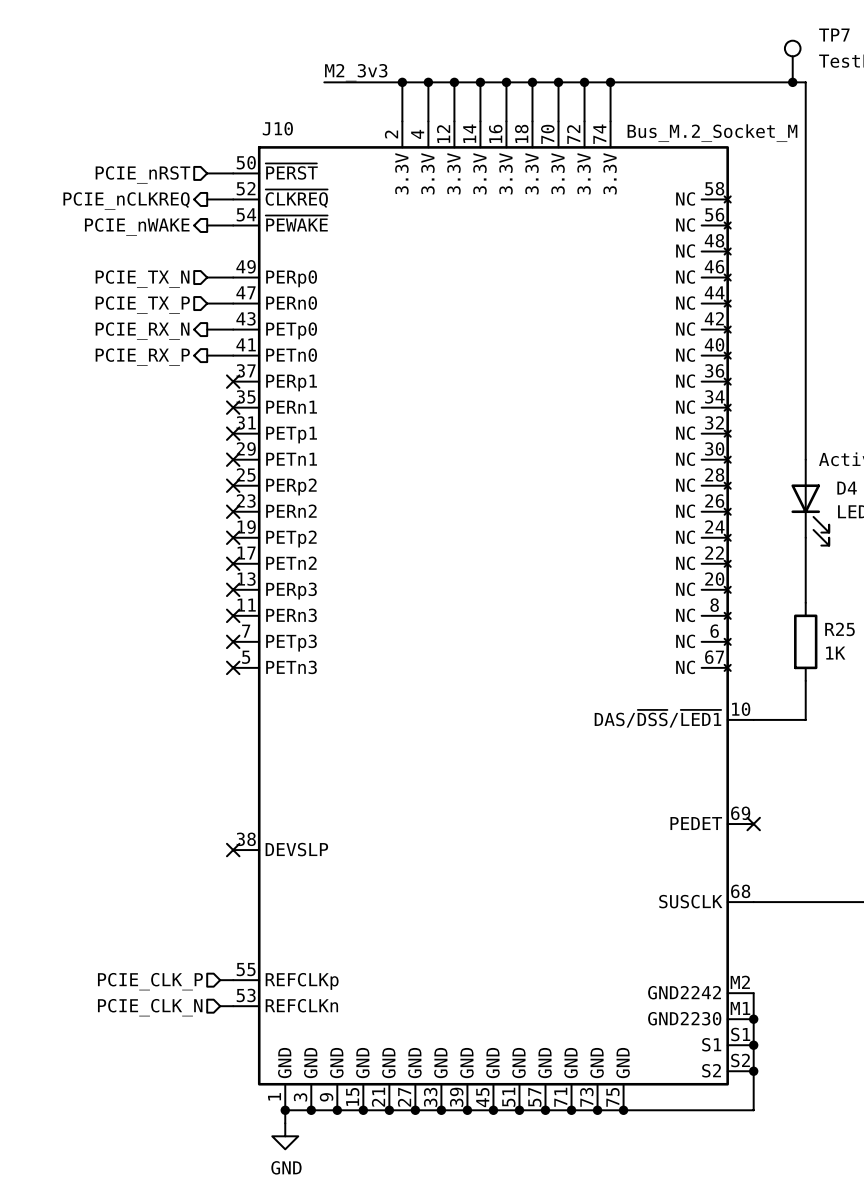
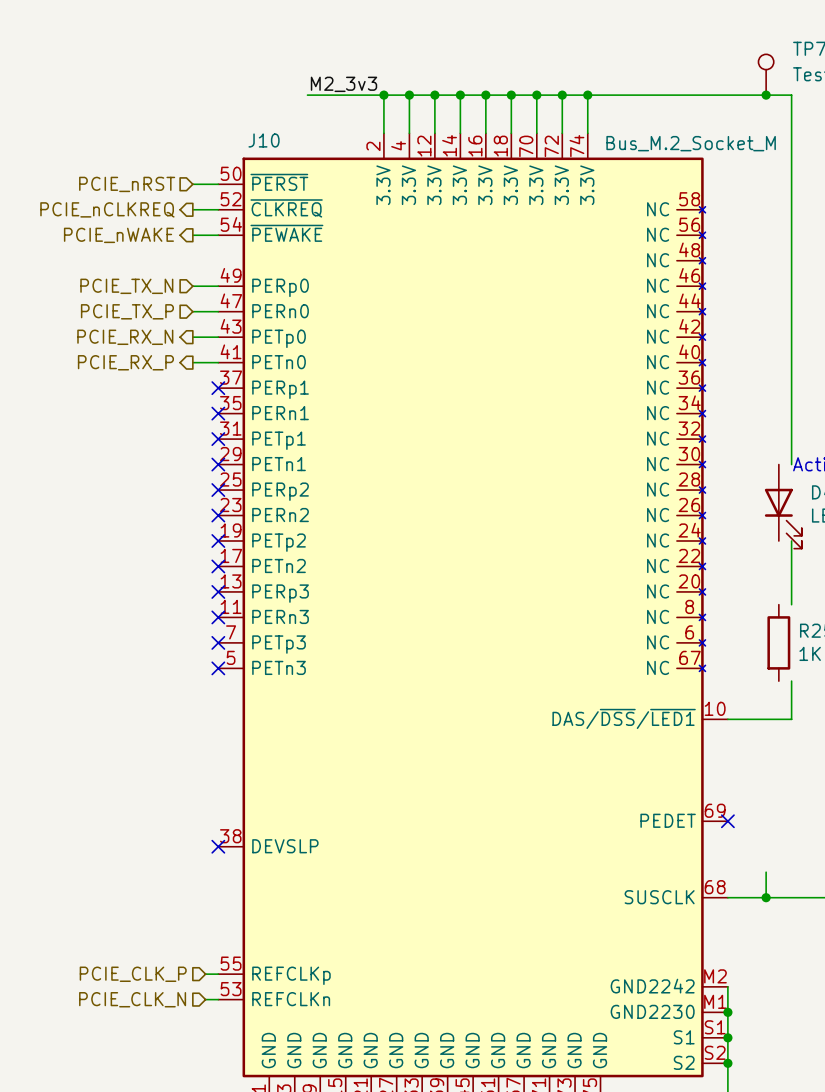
wire: (805, 82) (805, 459) -> (778, 95) (791, 95) (791, 464)
wire: (805, 537) (805, 602) -> (791, 540) (791, 604)
wire: (805, 680) (805, 719) -> (791, 681) (791, 719) (778, 719)
wire: none -> (766, 872) (766, 897)
junction: none -> (766, 897)

